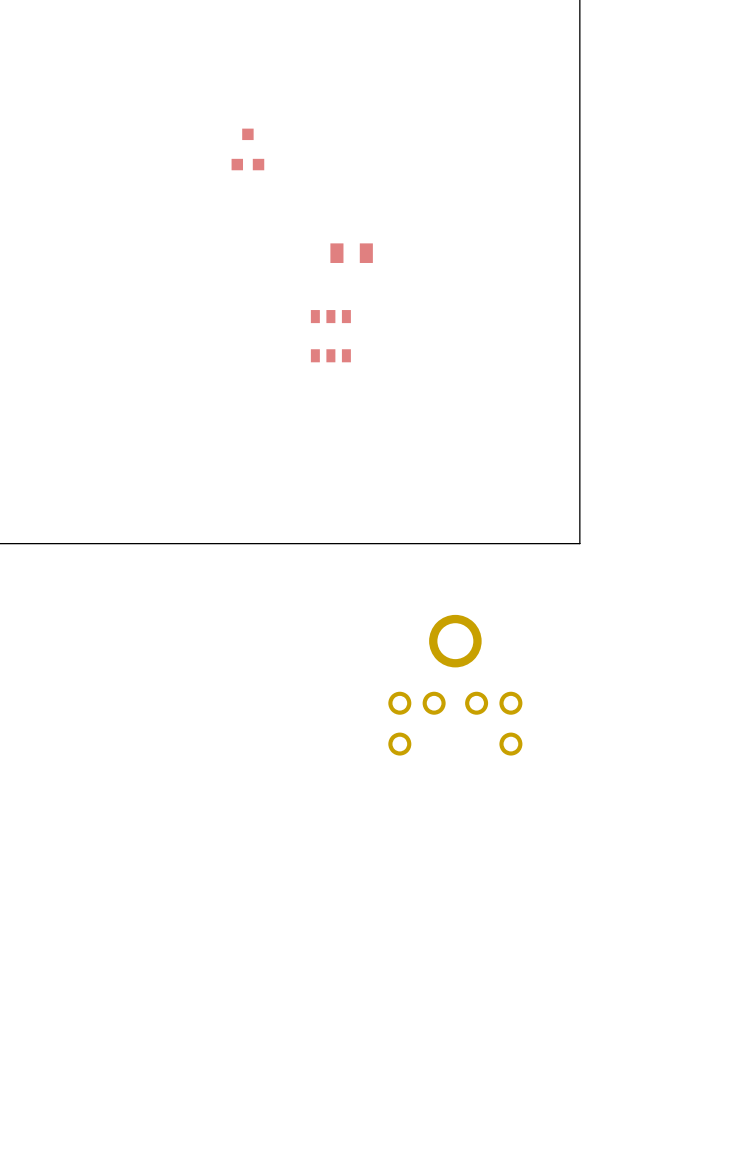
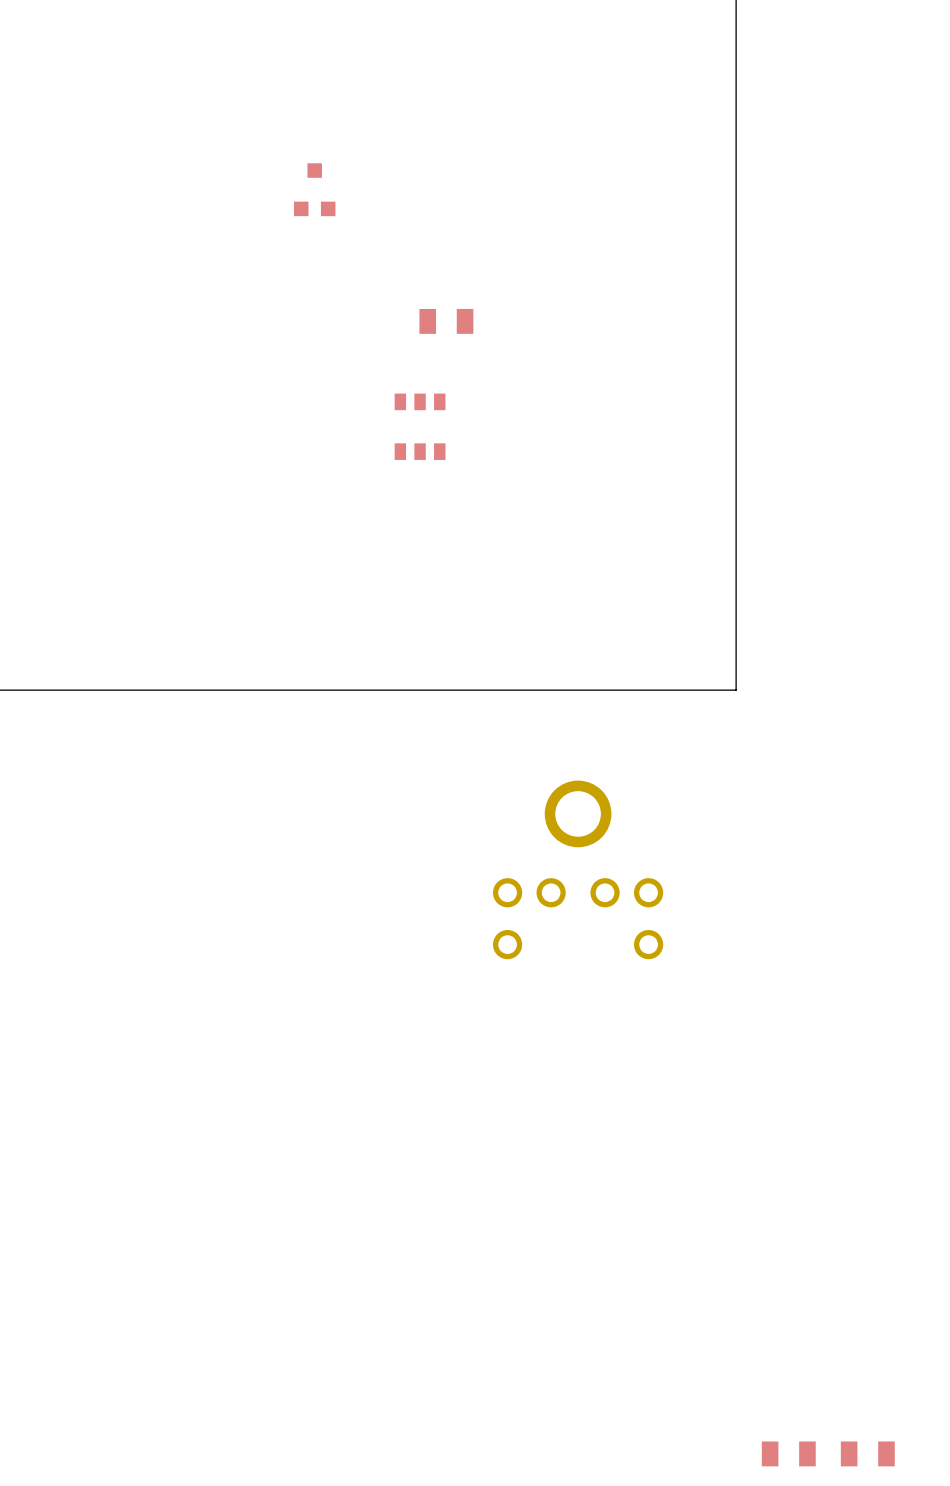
part: none -> (788, 1453)
part: none -> (867, 1453)

